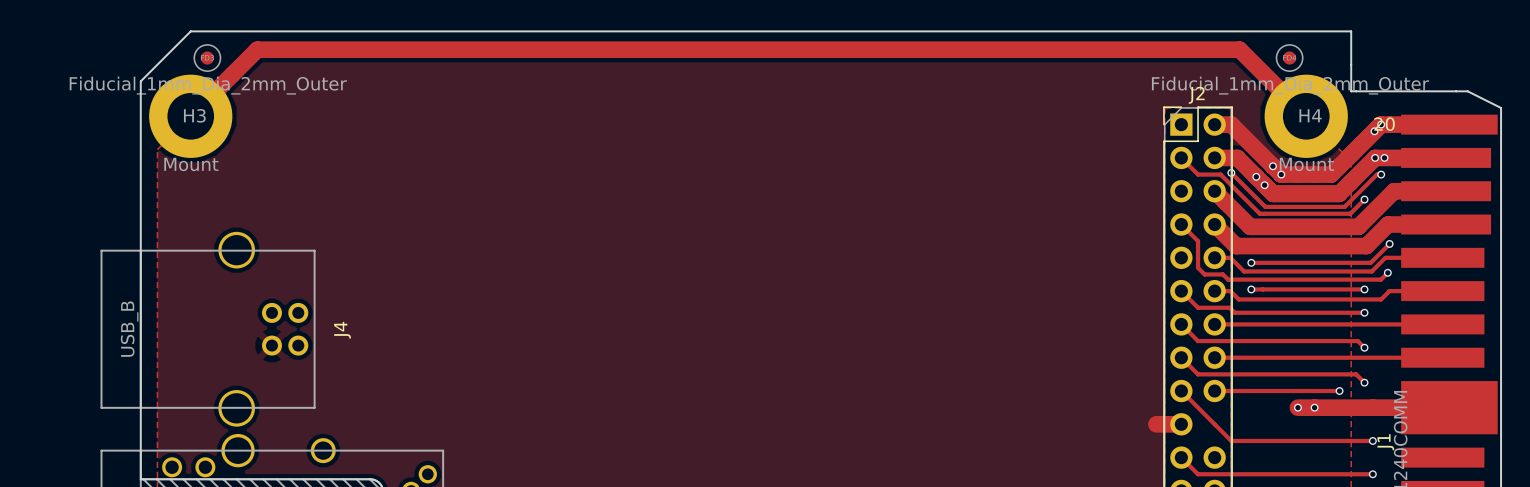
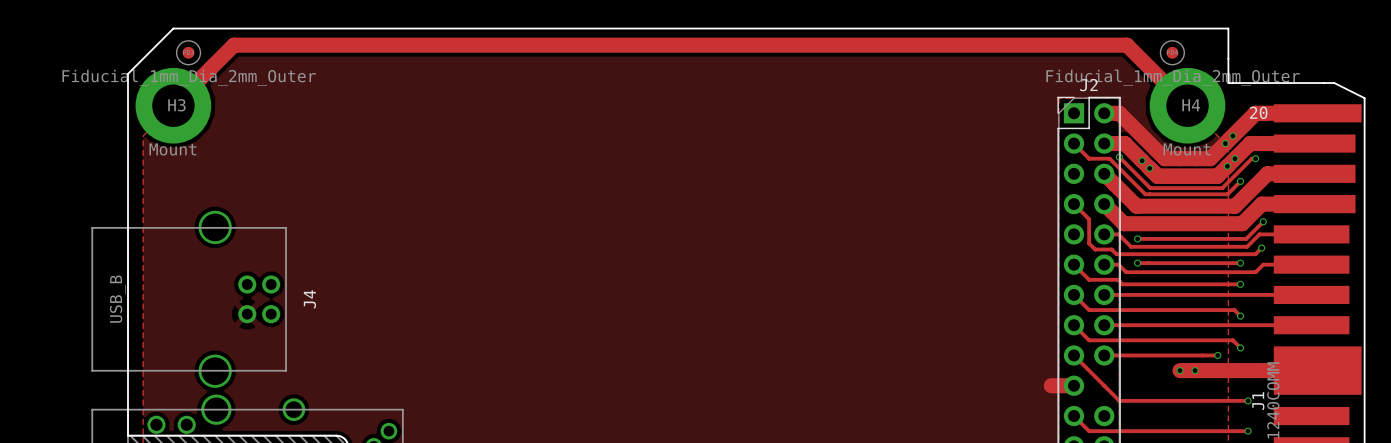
via: (1381, 124) -> none
via: (1374, 131) -> none
via: none -> (1232, 136)
via: none -> (1225, 143)
via: (1375, 157) -> none
via: (1384, 157) -> none
via: (1272, 166) -> none
via: (1281, 174) -> none
via: none -> (1235, 158)
via: none -> (1227, 166)

